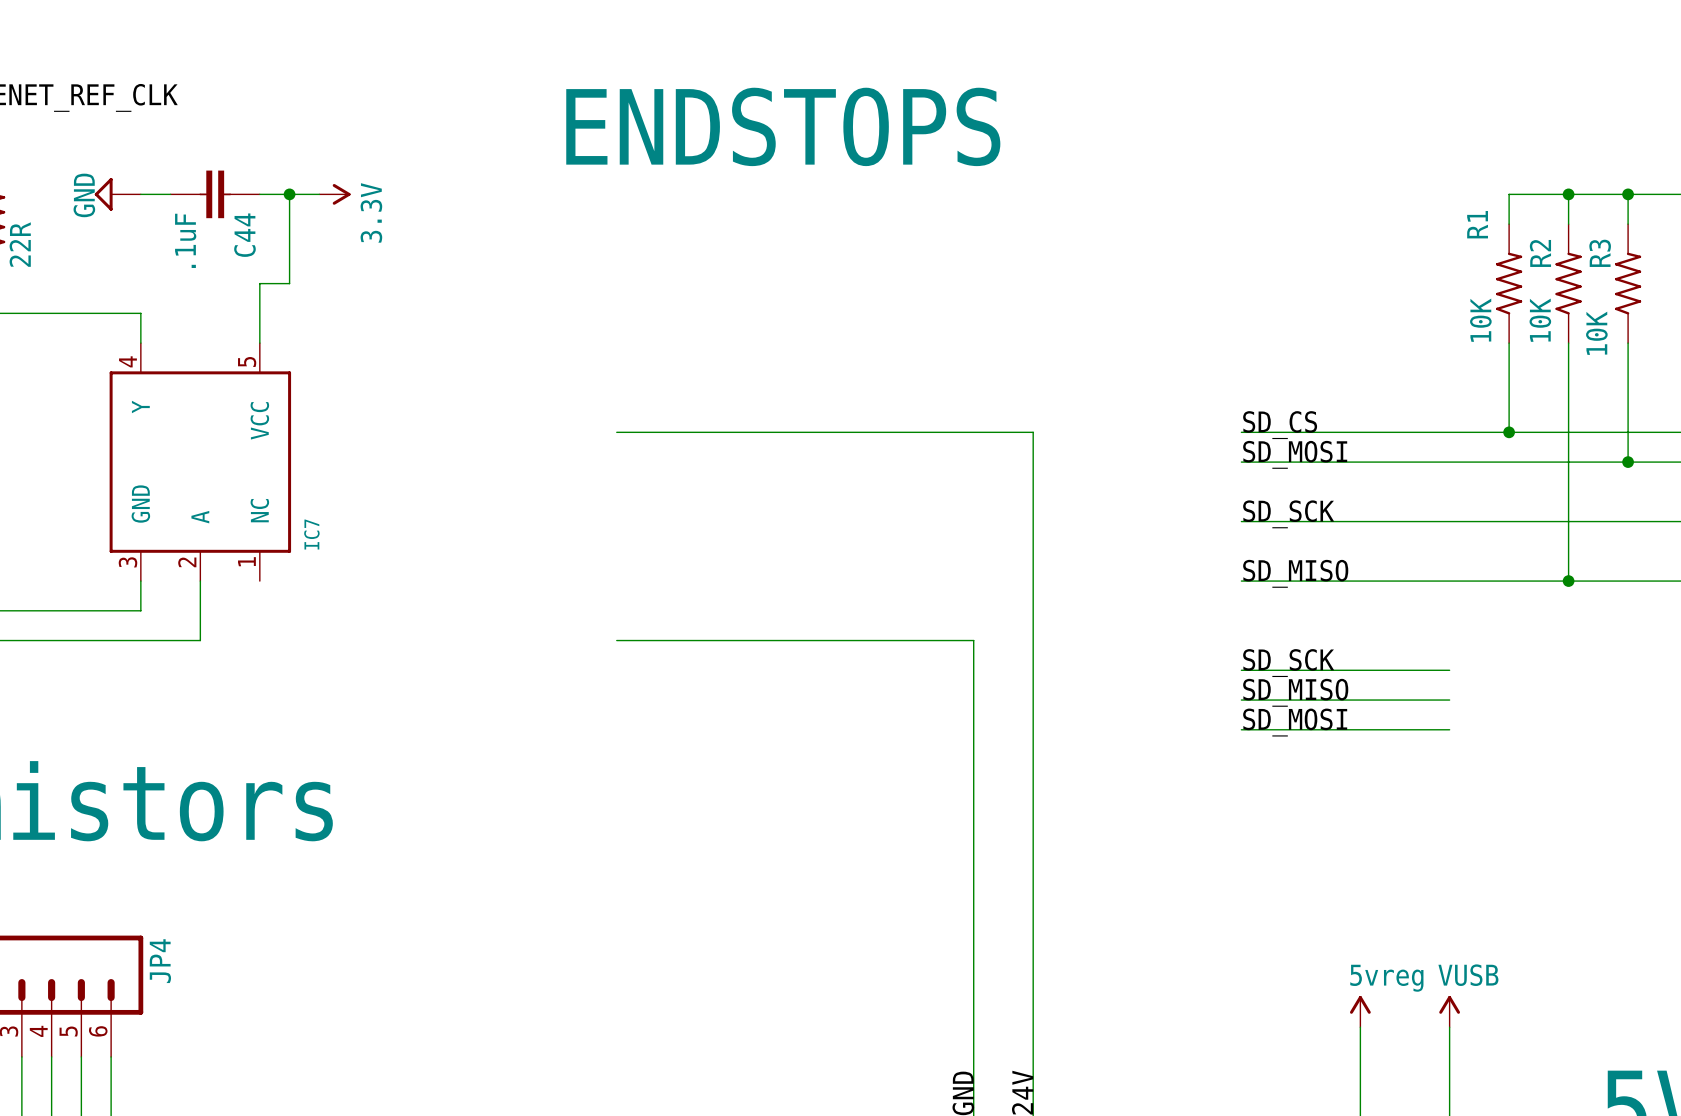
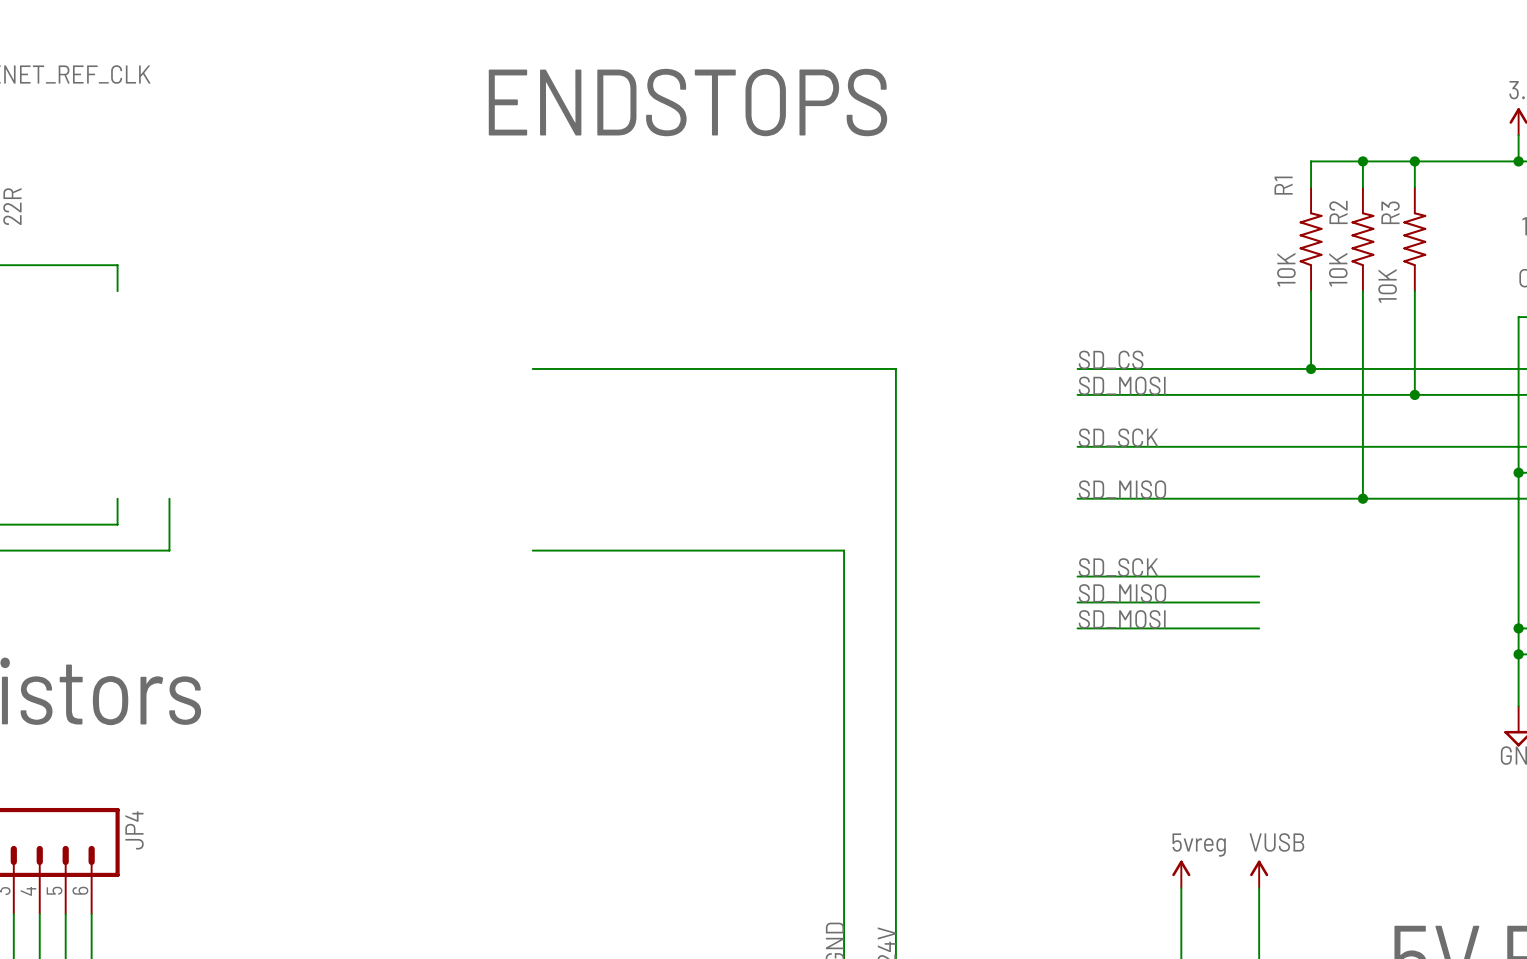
power symbol: GND (117, 194) -> none
wire: (140, 194) (170, 194) -> none
C44: .1uF (215, 194) -> none
wire: (259, 194) (319, 194) -> none
wire: (289, 194) (289, 283) (259, 283) (259, 343) -> none
junction: (289, 194) -> none
power symbol: 3.3V (334, 194) -> none
IC7: (200, 462) -> none

